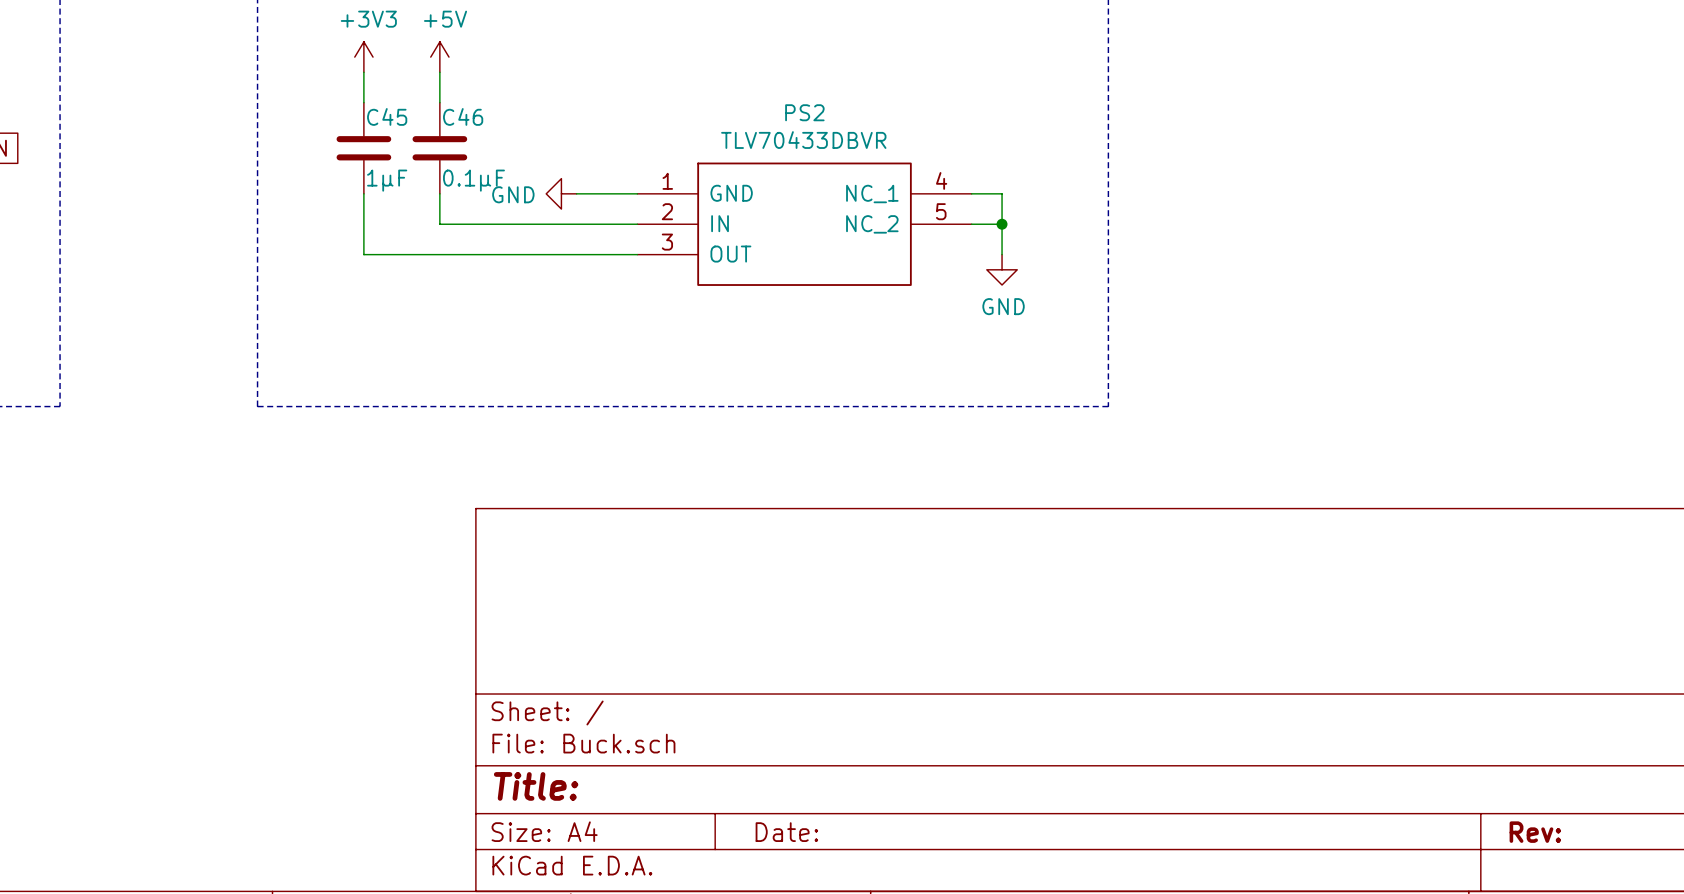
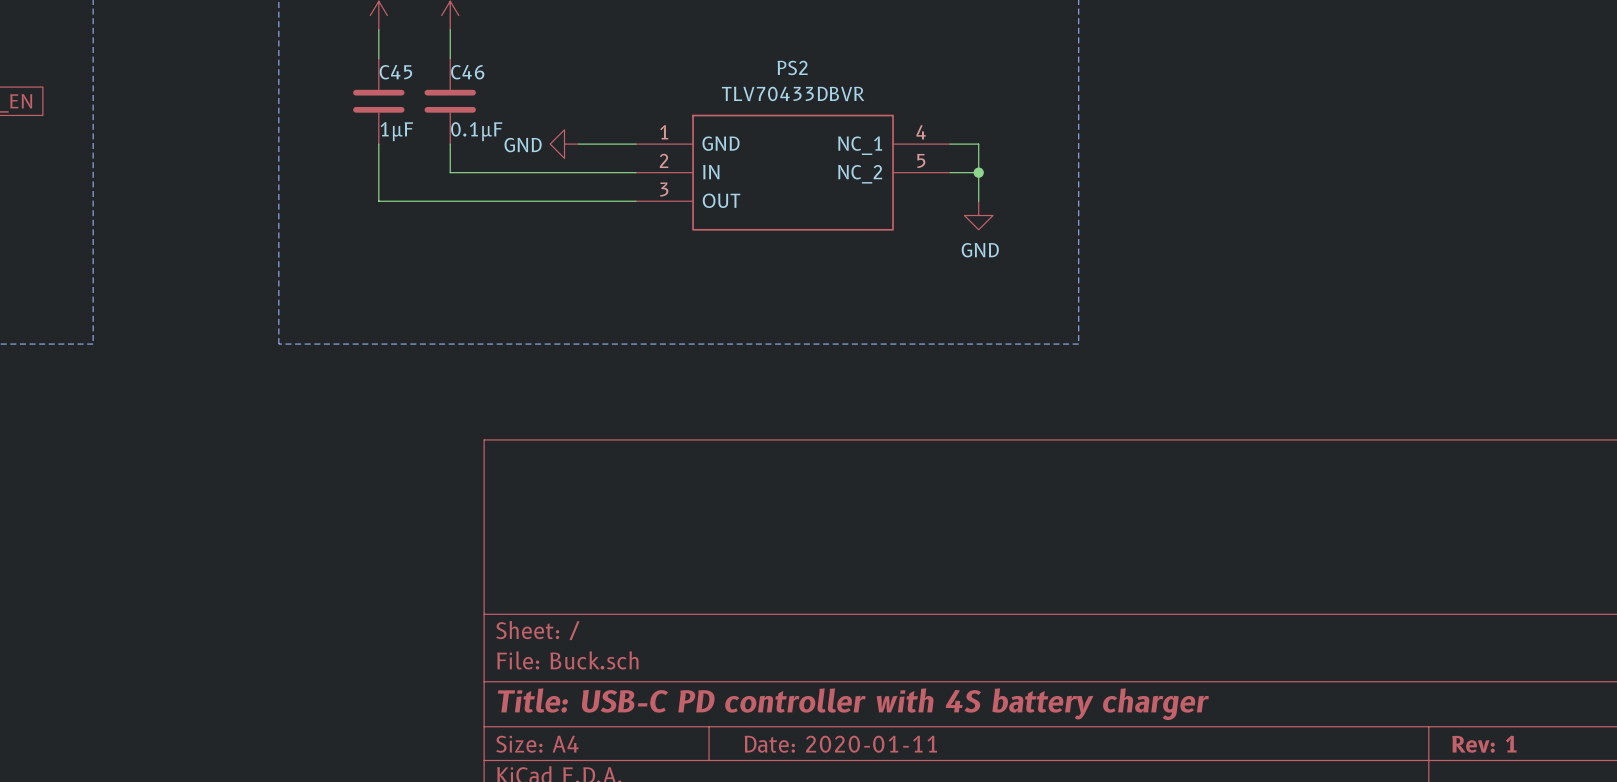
title block: Title: (536, 786) -> Title: USB-C PD controller with 4S battery charger (853, 704)
title block: Date: (786, 832) -> Date: 2020-01-11 (840, 744)
title block: Rev: (1535, 832) -> Rev: 1 (1484, 744)

